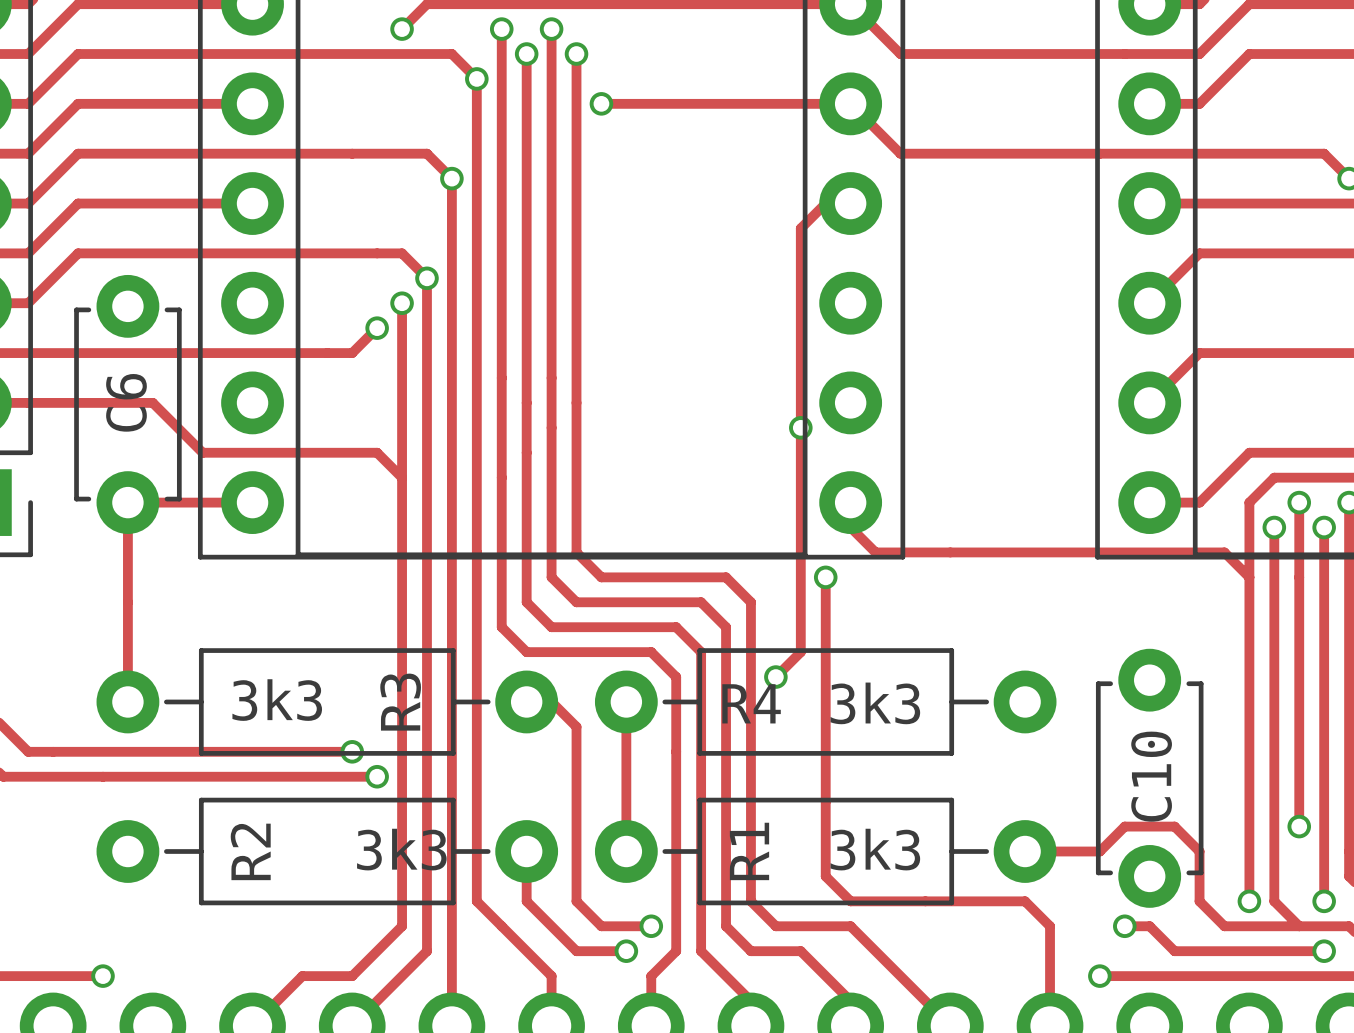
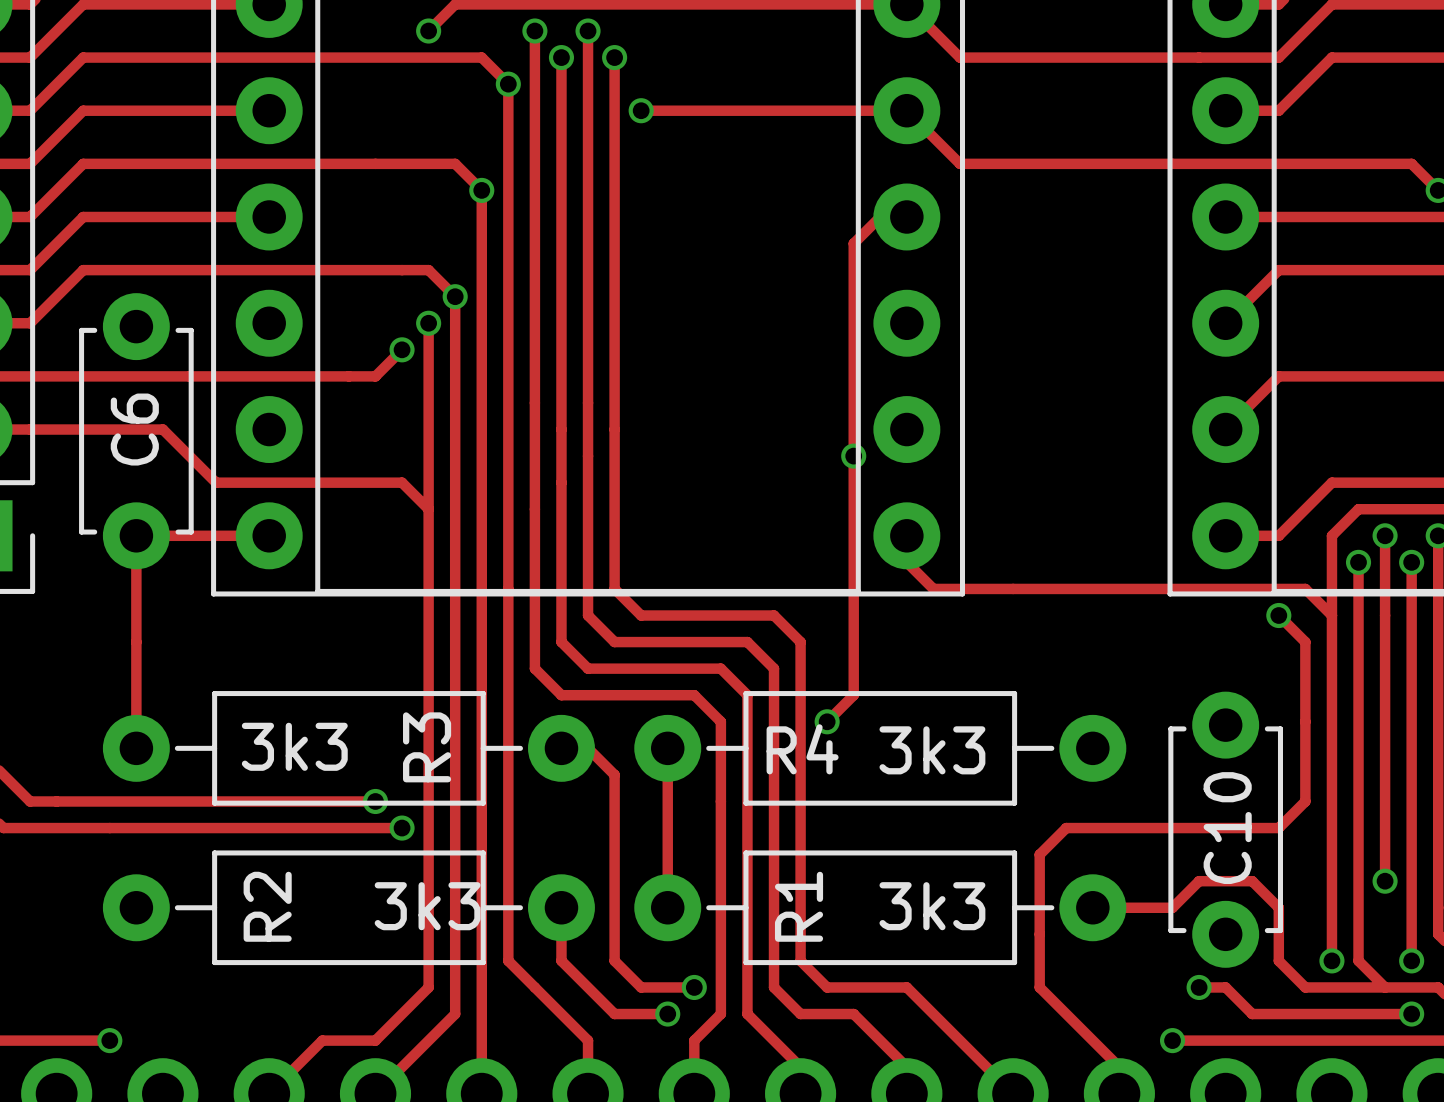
track: (825, 577) (825, 876) (850, 901) (1025, 901) (1050, 926) (1050, 1001) -> (1278, 615) (1305, 642) (1305, 801) (1278, 828) (1066, 828) (1039, 854) (1039, 987) (1119, 1067)
via: (825, 577) -> none
via: none -> (1278, 615)

